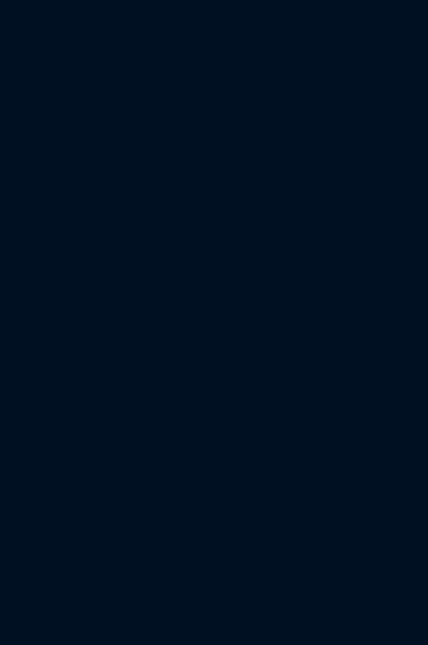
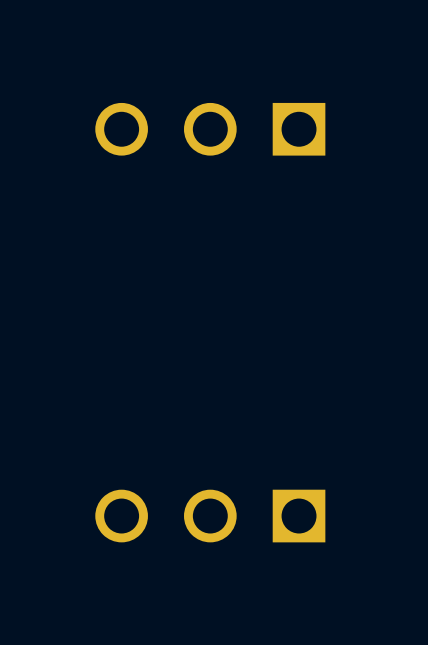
part: none -> (210, 129)
part: none -> (210, 516)

